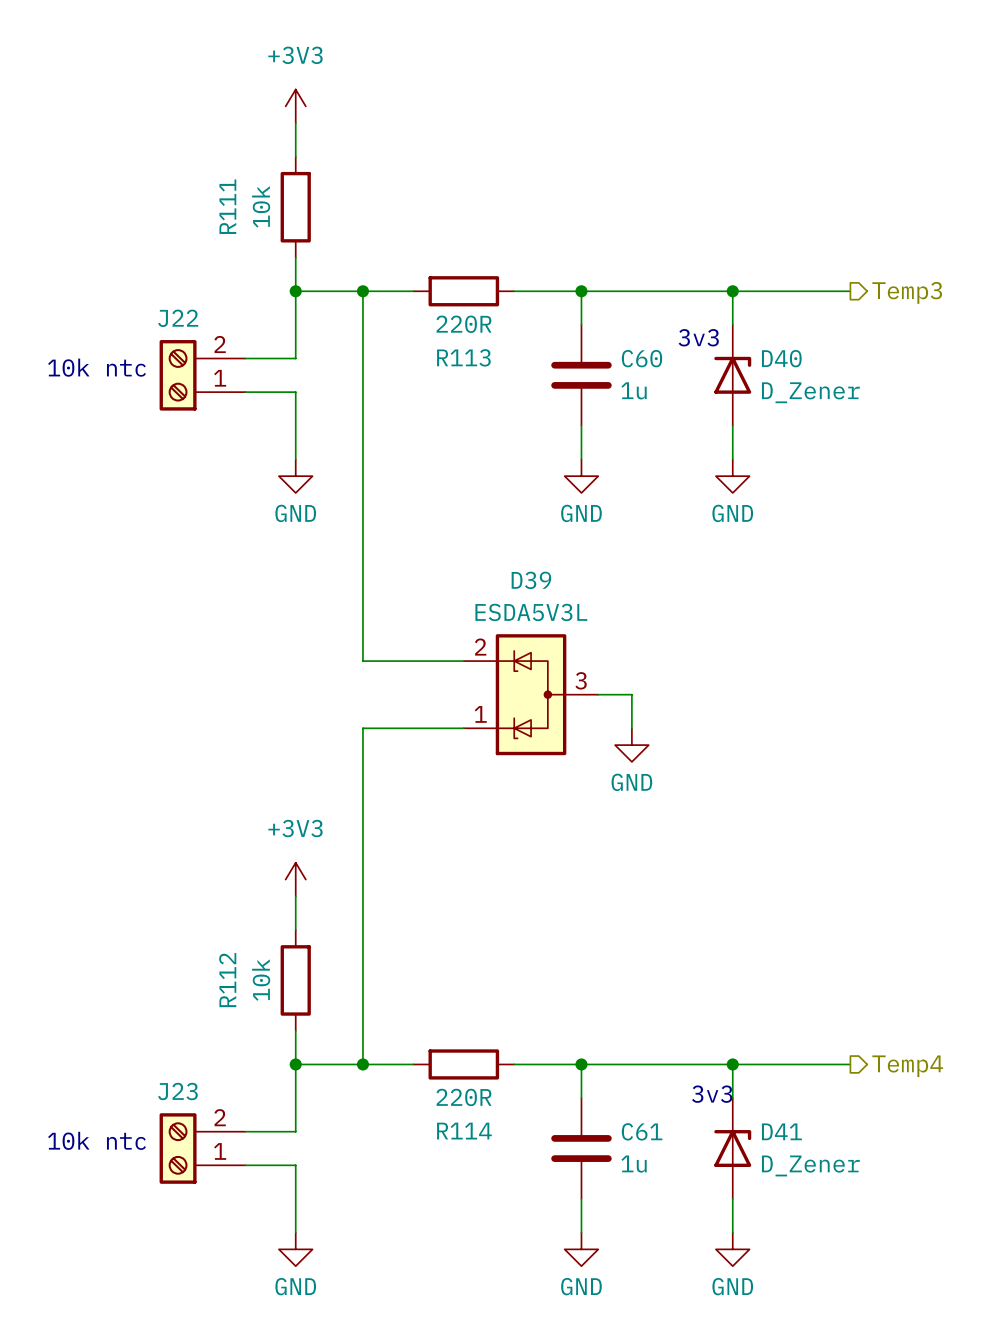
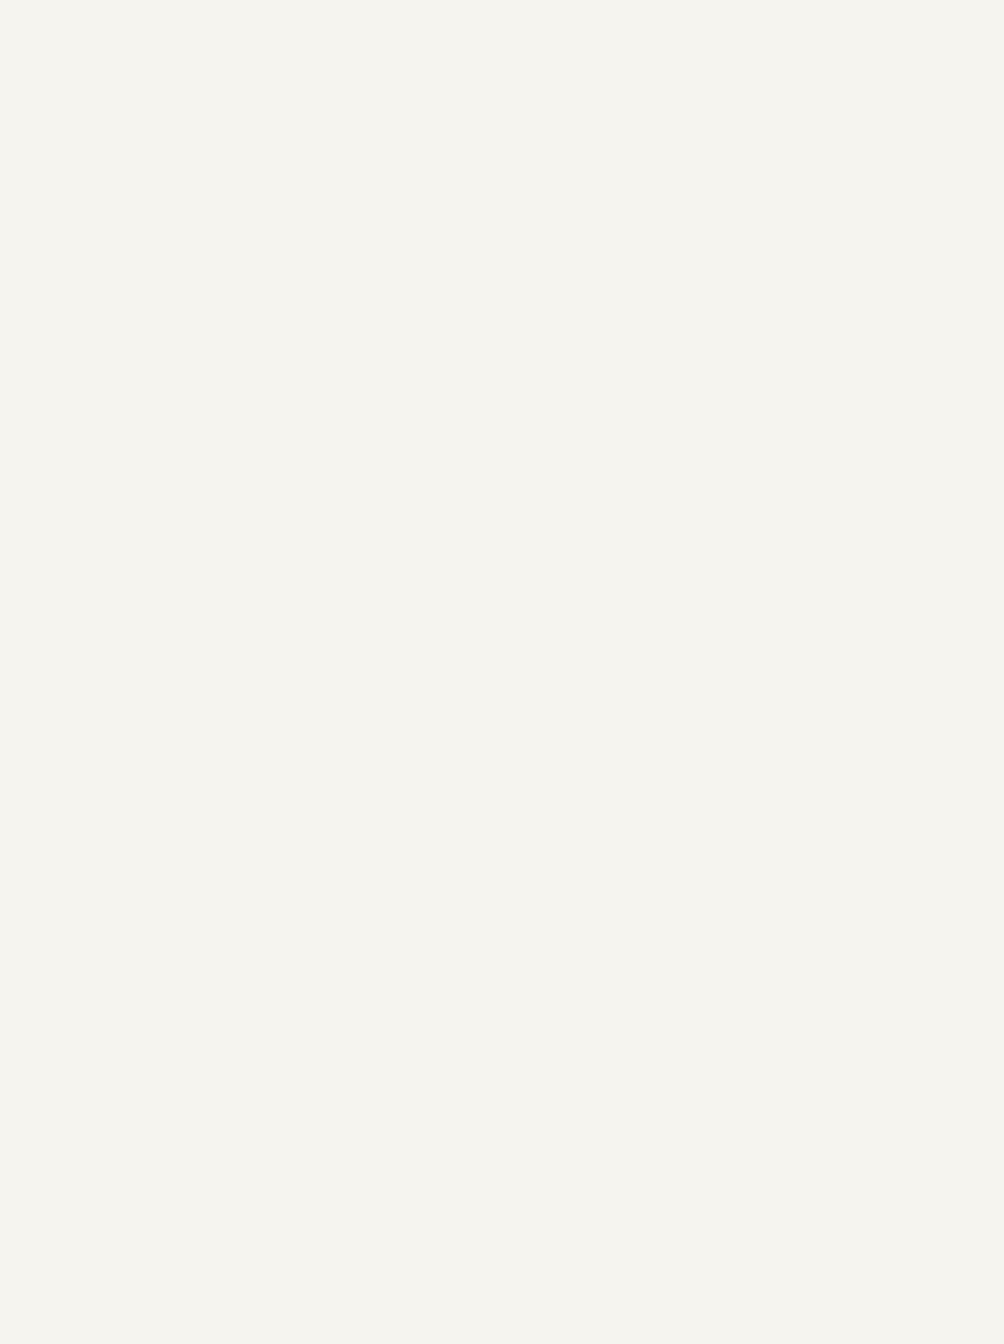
power symbol: +3V3 (295, 106) -> none
wire: (295, 123) (295, 156) -> none
R111: 10k (295, 207) -> none
wire: (295, 257) (295, 358) (245, 358) -> none
wire: (295, 291) (413, 291) -> none
junction: (295, 291) -> none
wire: (362, 291) (362, 661) (463, 661) -> none
junction: (362, 291) -> none
R113: 220R (463, 291) -> none
wire: (514, 291) (850, 291) -> none
wire: (581, 291) (581, 324) -> none
junction: (581, 291) -> none
wire: (732, 291) (732, 324) -> none
junction: (732, 291) -> none
hierarchical label: Temp3 (907, 292) -> none
text: 3v3 (698, 337) -> none
text: 10k ntc (97, 367) -> none
J22: (202, 375) -> none
C60: 1u (581, 375) -> none
D40: D_Zener (732, 375) -> none
wire: (245, 392) (295, 392) (295, 459) -> none
wire: (581, 425) (581, 459) -> none
wire: (732, 425) (732, 459) -> none
power symbol: GND (295, 476) -> none
power symbol: GND (581, 476) -> none
power symbol: GND (732, 476) -> none
D39: ESDA5V3L (531, 694) -> none
wire: (598, 694) (631, 694) (631, 728) -> none
wire: (463, 728) (362, 728) (362, 1064) -> none
power symbol: GND (631, 745) -> none
power symbol: +3V3 (295, 879) -> none
wire: (295, 896) (295, 930) -> none
R112: 10k (295, 980) -> none
wire: (295, 1030) (295, 1131) (245, 1131) -> none
wire: (295, 1064) (413, 1064) -> none
junction: (295, 1064) -> none
junction: (362, 1064) -> none
R114: 220R (463, 1064) -> none
wire: (514, 1064) (850, 1064) -> none
wire: (581, 1064) (581, 1098) -> none
junction: (581, 1064) -> none
wire: (732, 1064) (732, 1098) -> none
junction: (732, 1064) -> none
hierarchical label: Temp4 (907, 1066) -> none
text: 3v3 (712, 1094) -> none
text: 10k ntc (97, 1140) -> none
J23: (202, 1148) -> none
C61: 1u (581, 1148) -> none
D41: D_Zener (732, 1148) -> none
wire: (245, 1165) (295, 1165) (295, 1232) -> none
wire: (581, 1198) (581, 1232) -> none
wire: (732, 1198) (732, 1232) -> none
power symbol: GND (295, 1249) -> none
power symbol: GND (581, 1249) -> none
power symbol: GND (732, 1249) -> none

